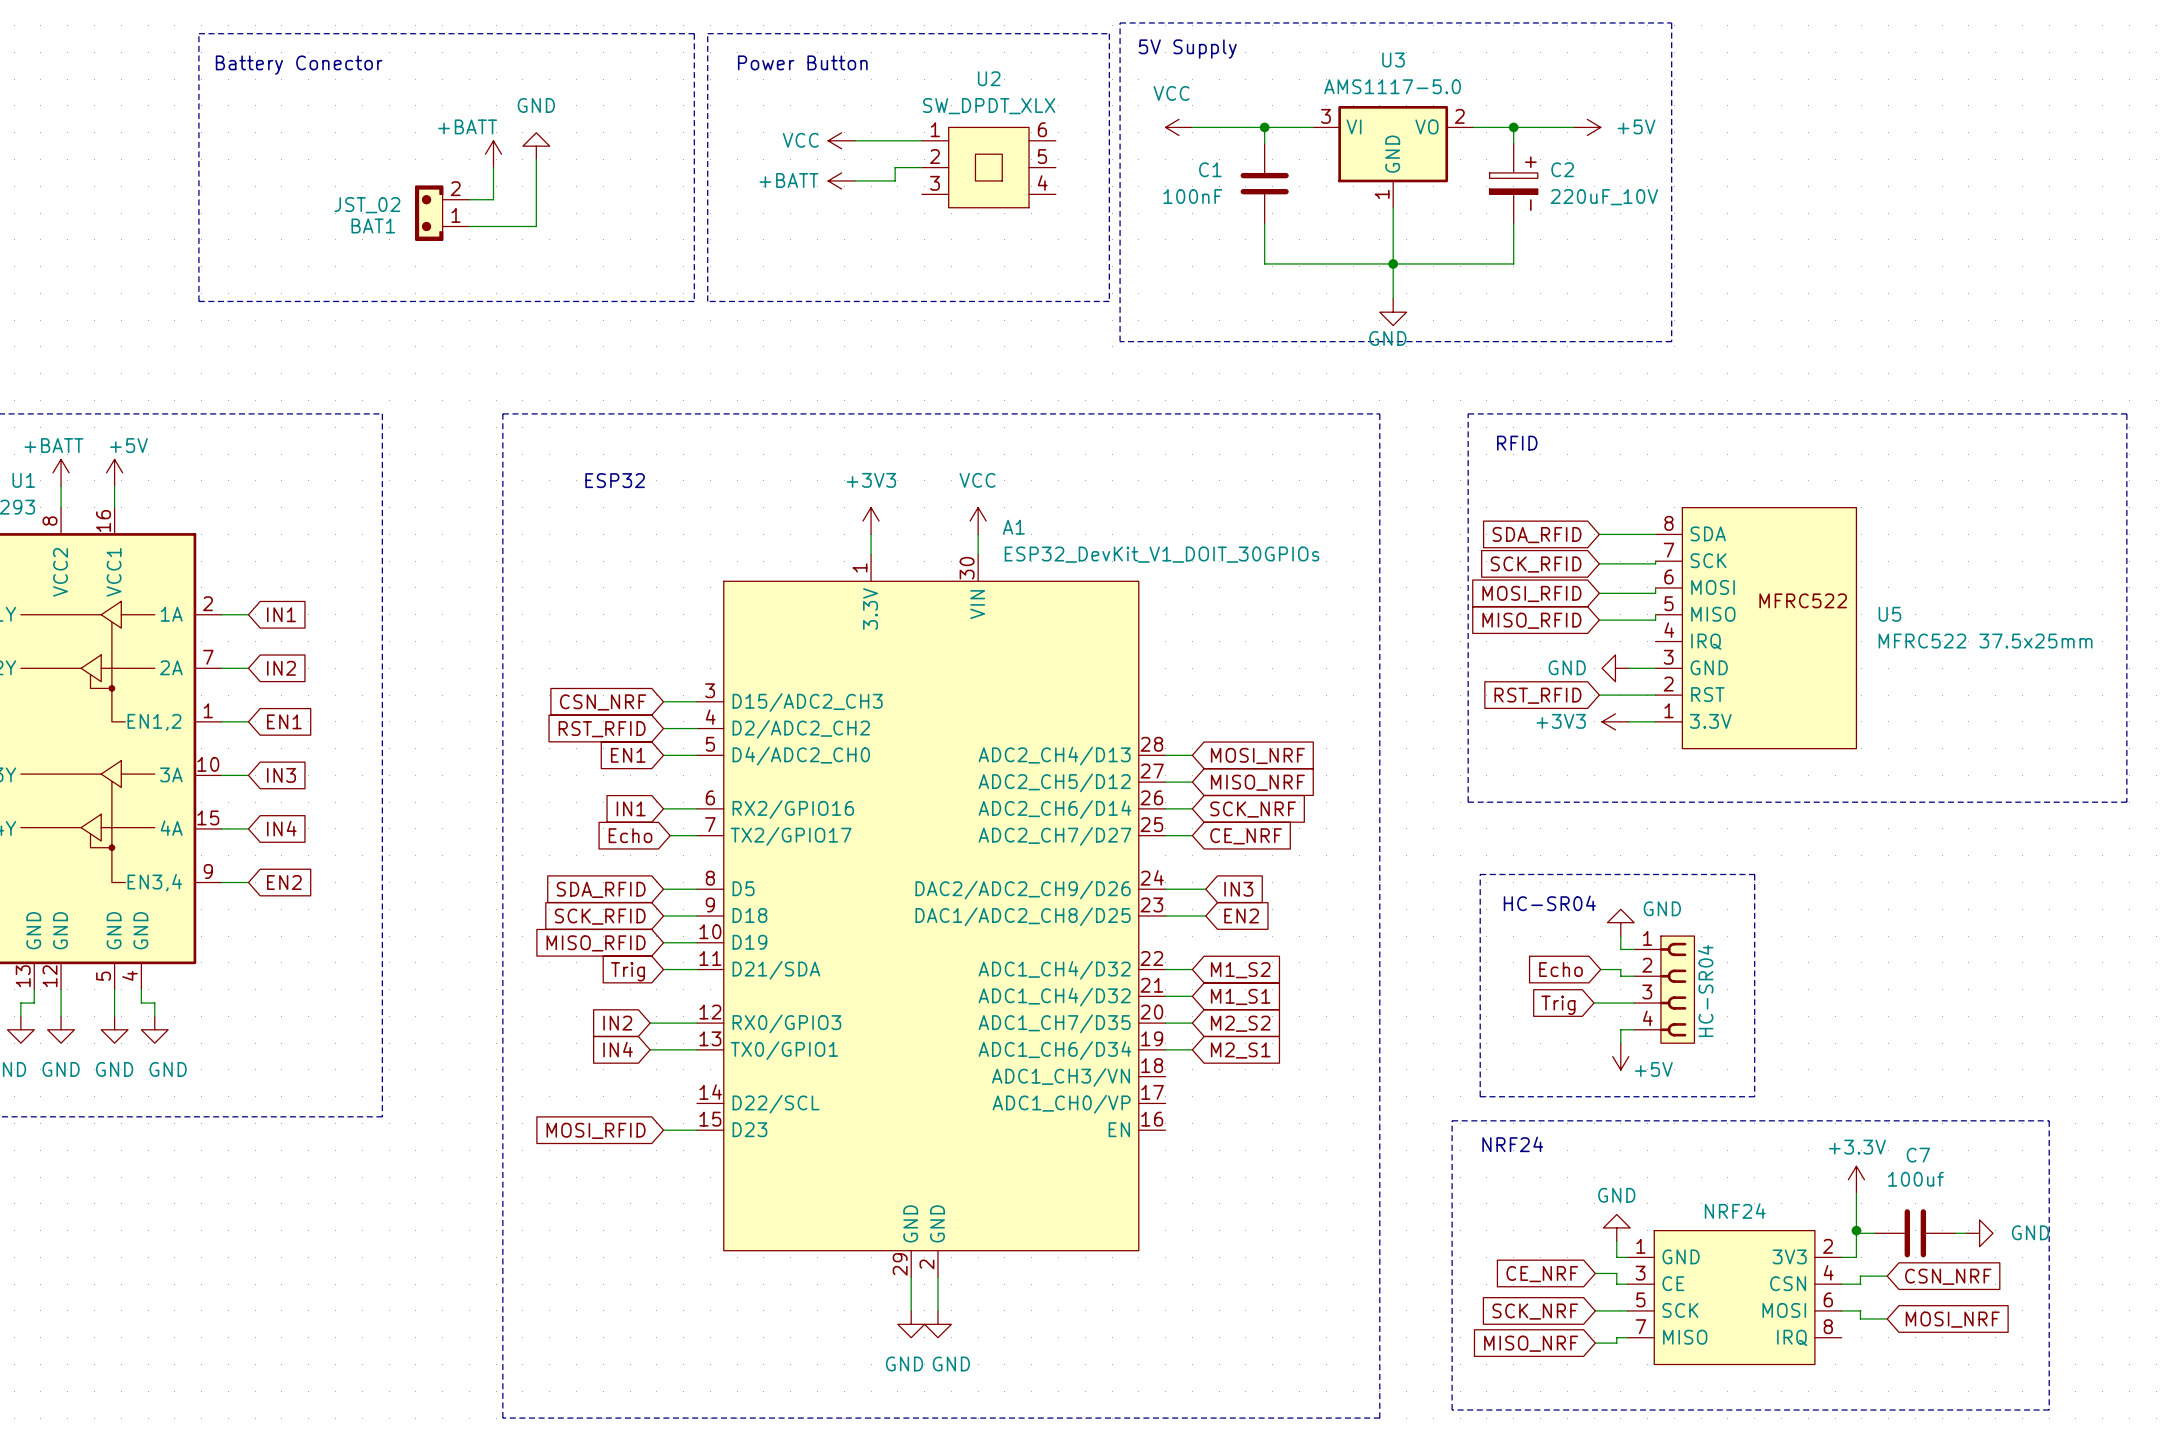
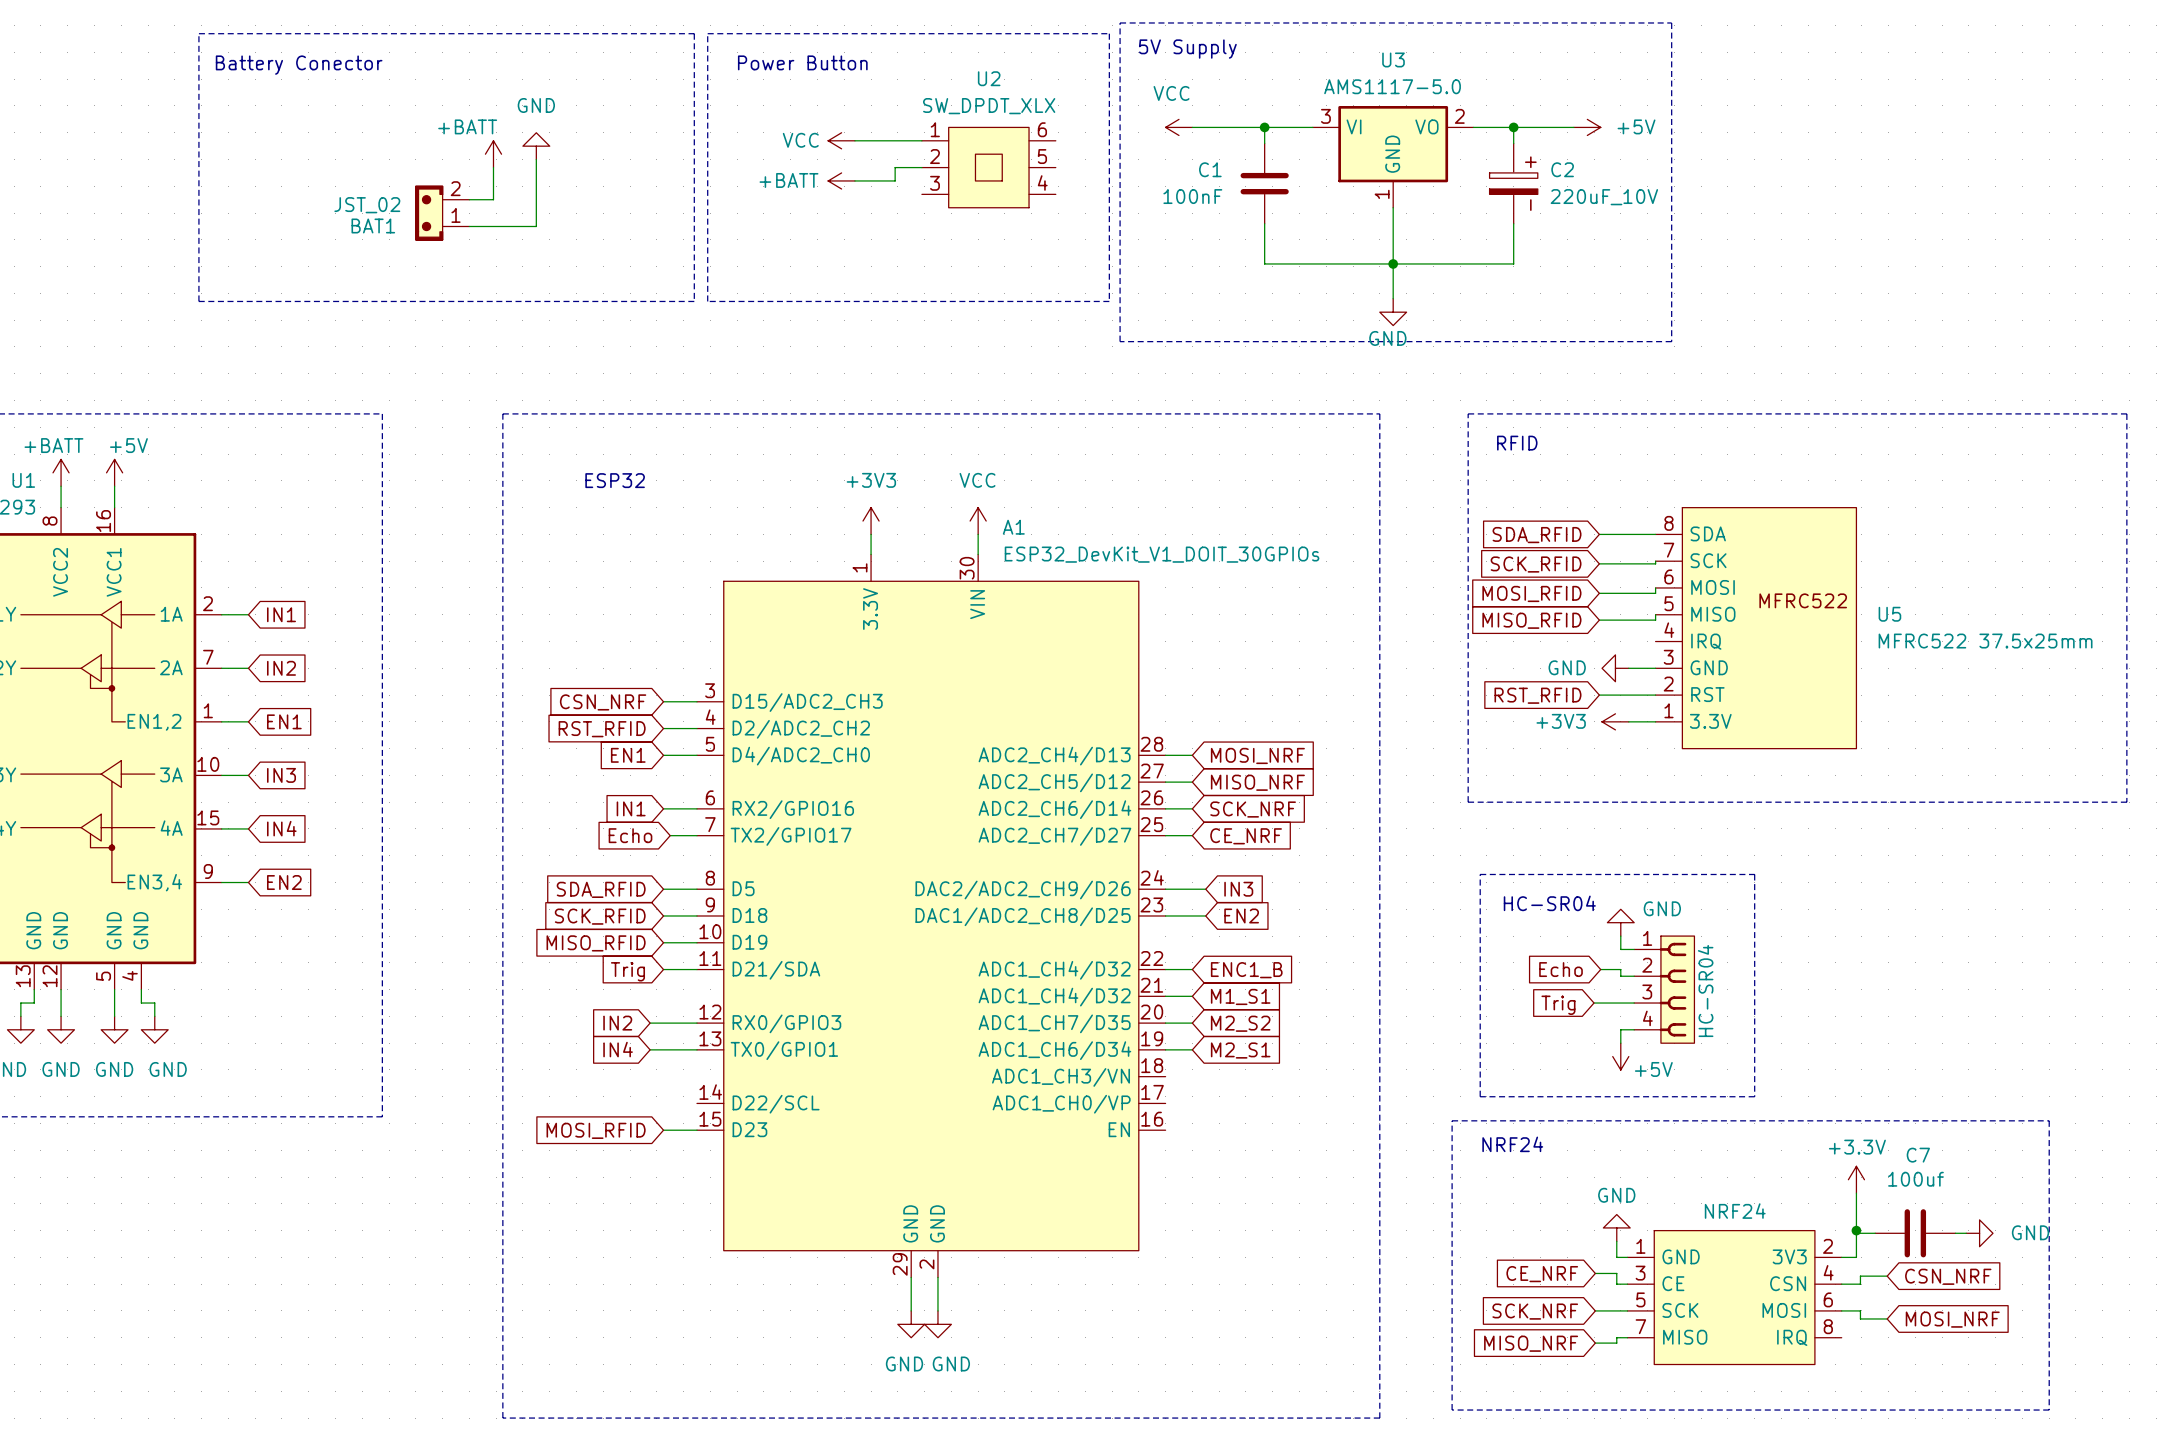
global label: M1_S2 (1240, 970) -> ENC1_B (1246, 970)

